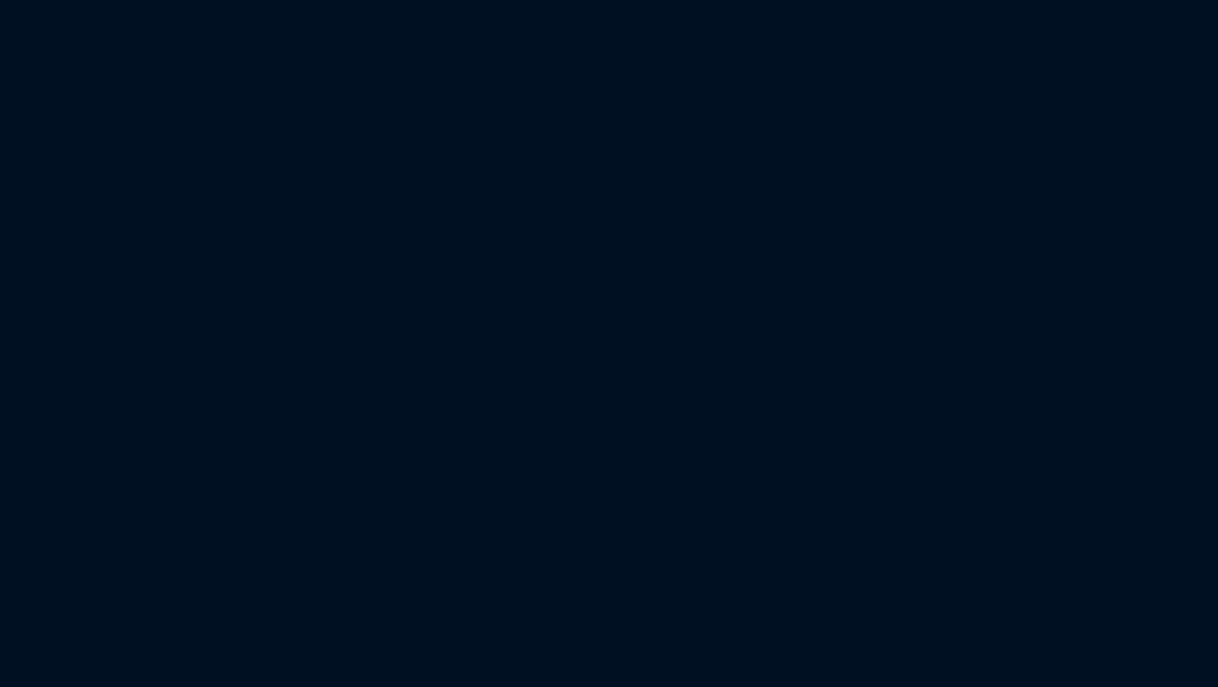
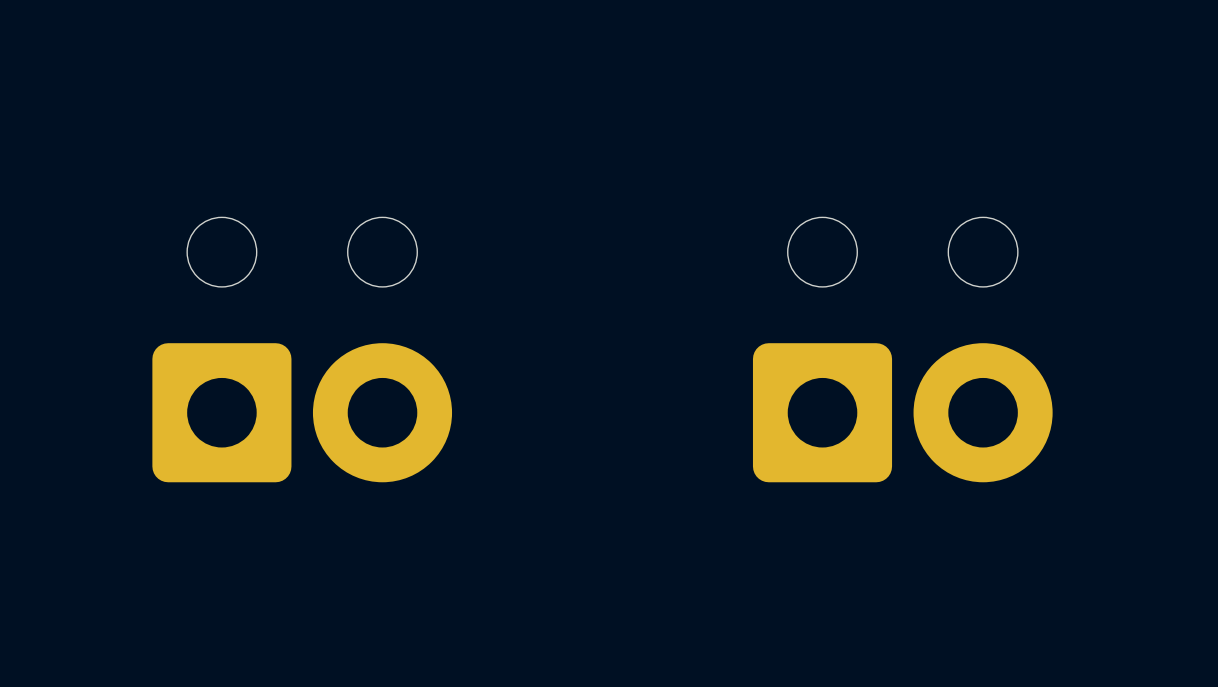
part: none -> (302, 349)
part: none -> (902, 349)

